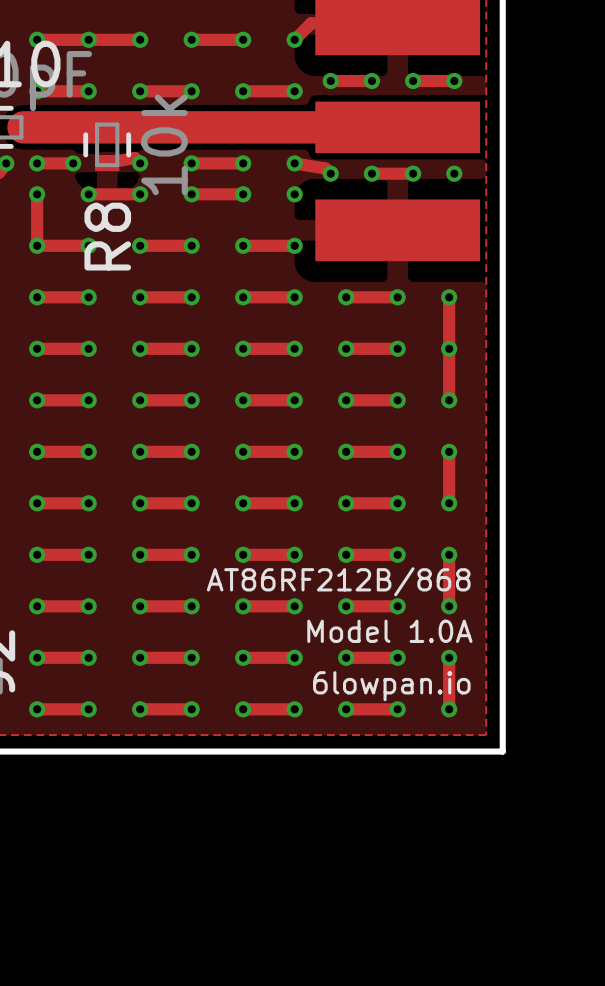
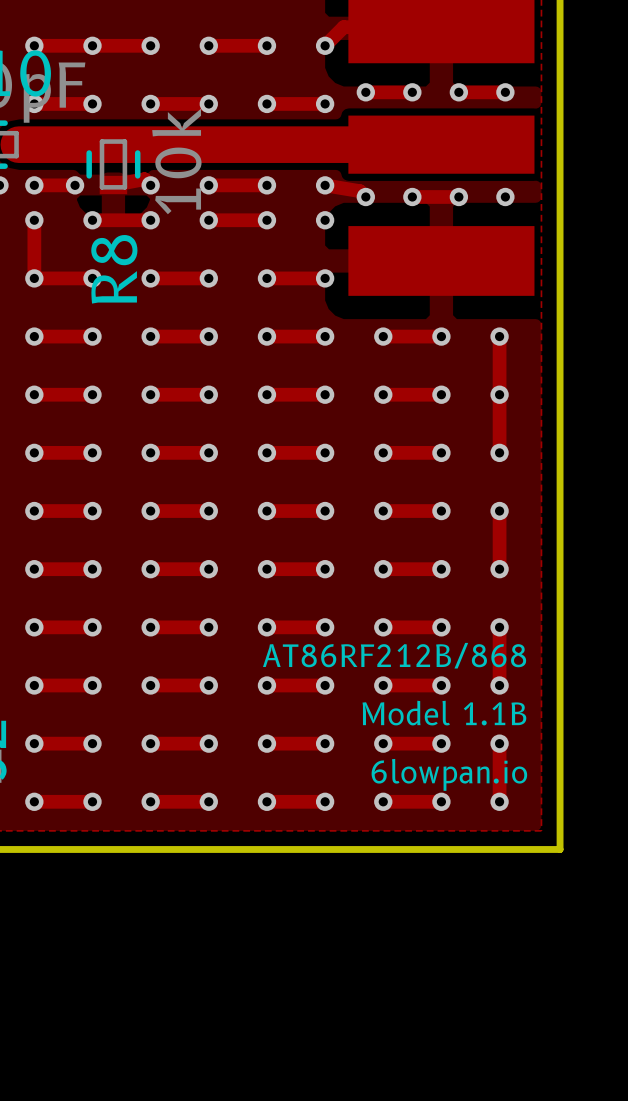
text: Model 1.0A (389, 631) -> Model 1.1B (444, 713)

